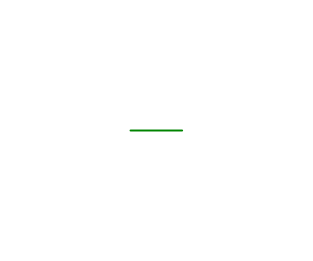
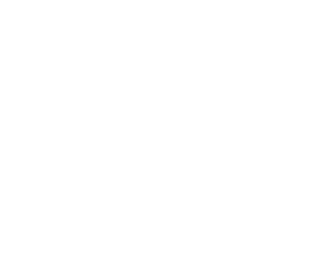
wire: (130, 130) (182, 130) -> none

